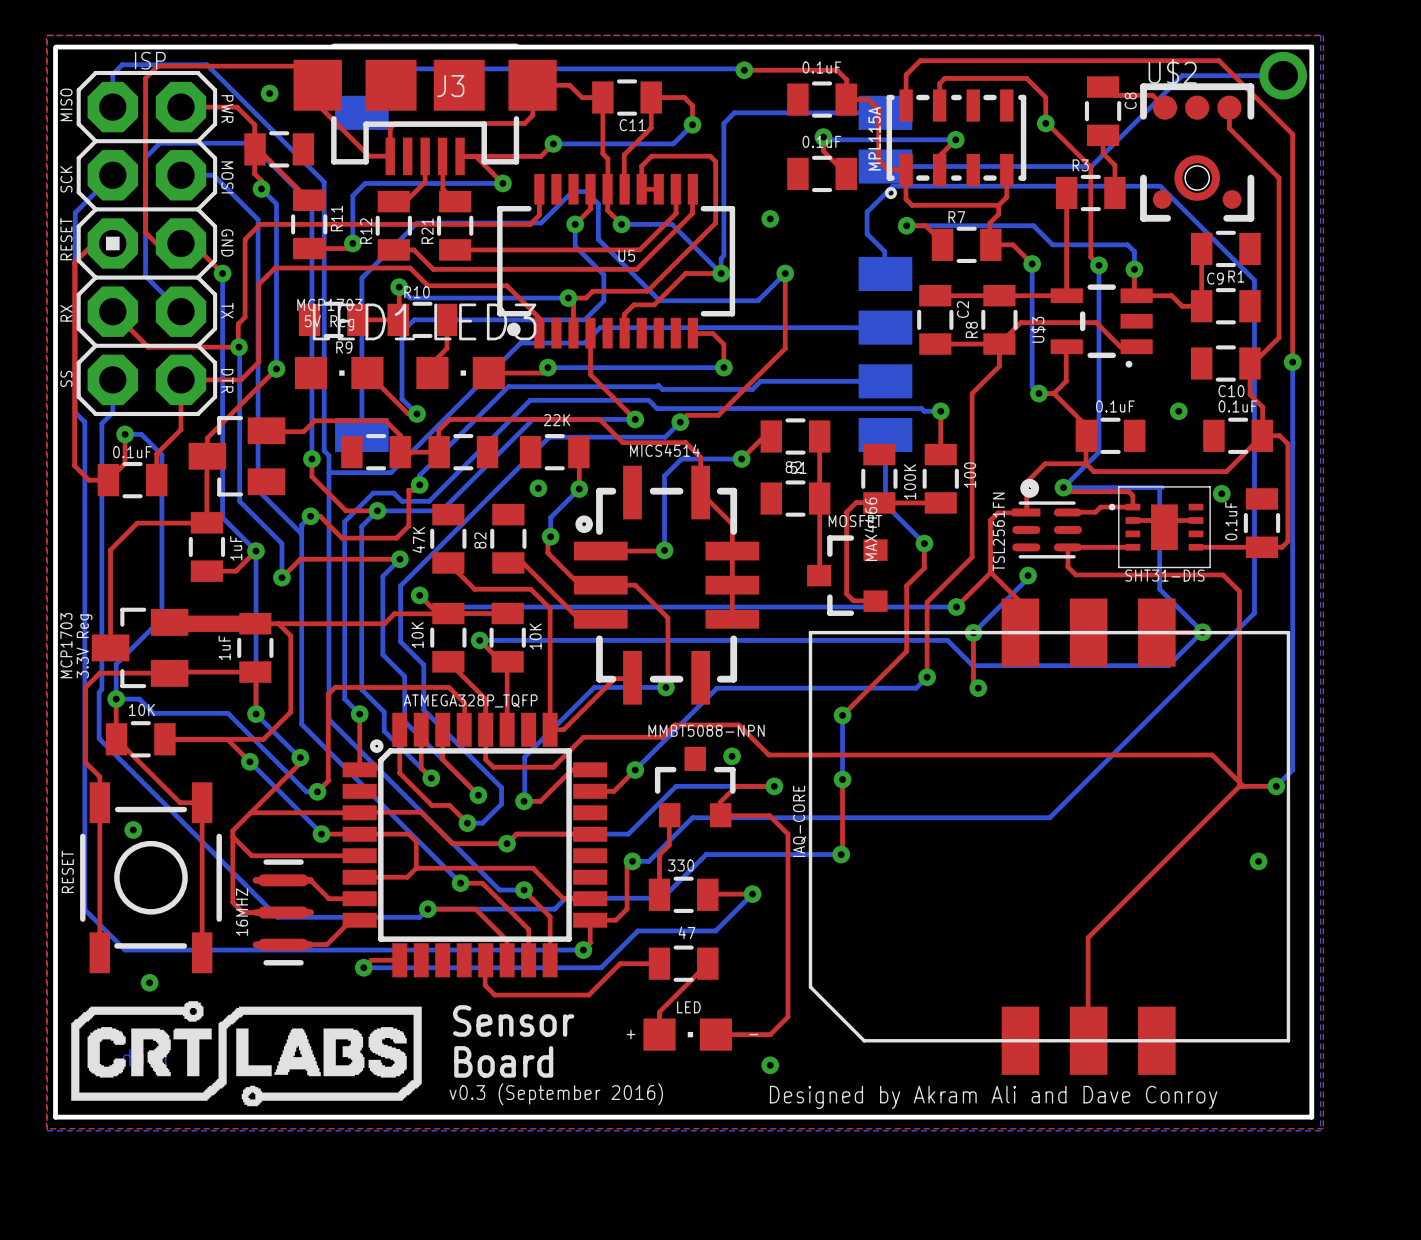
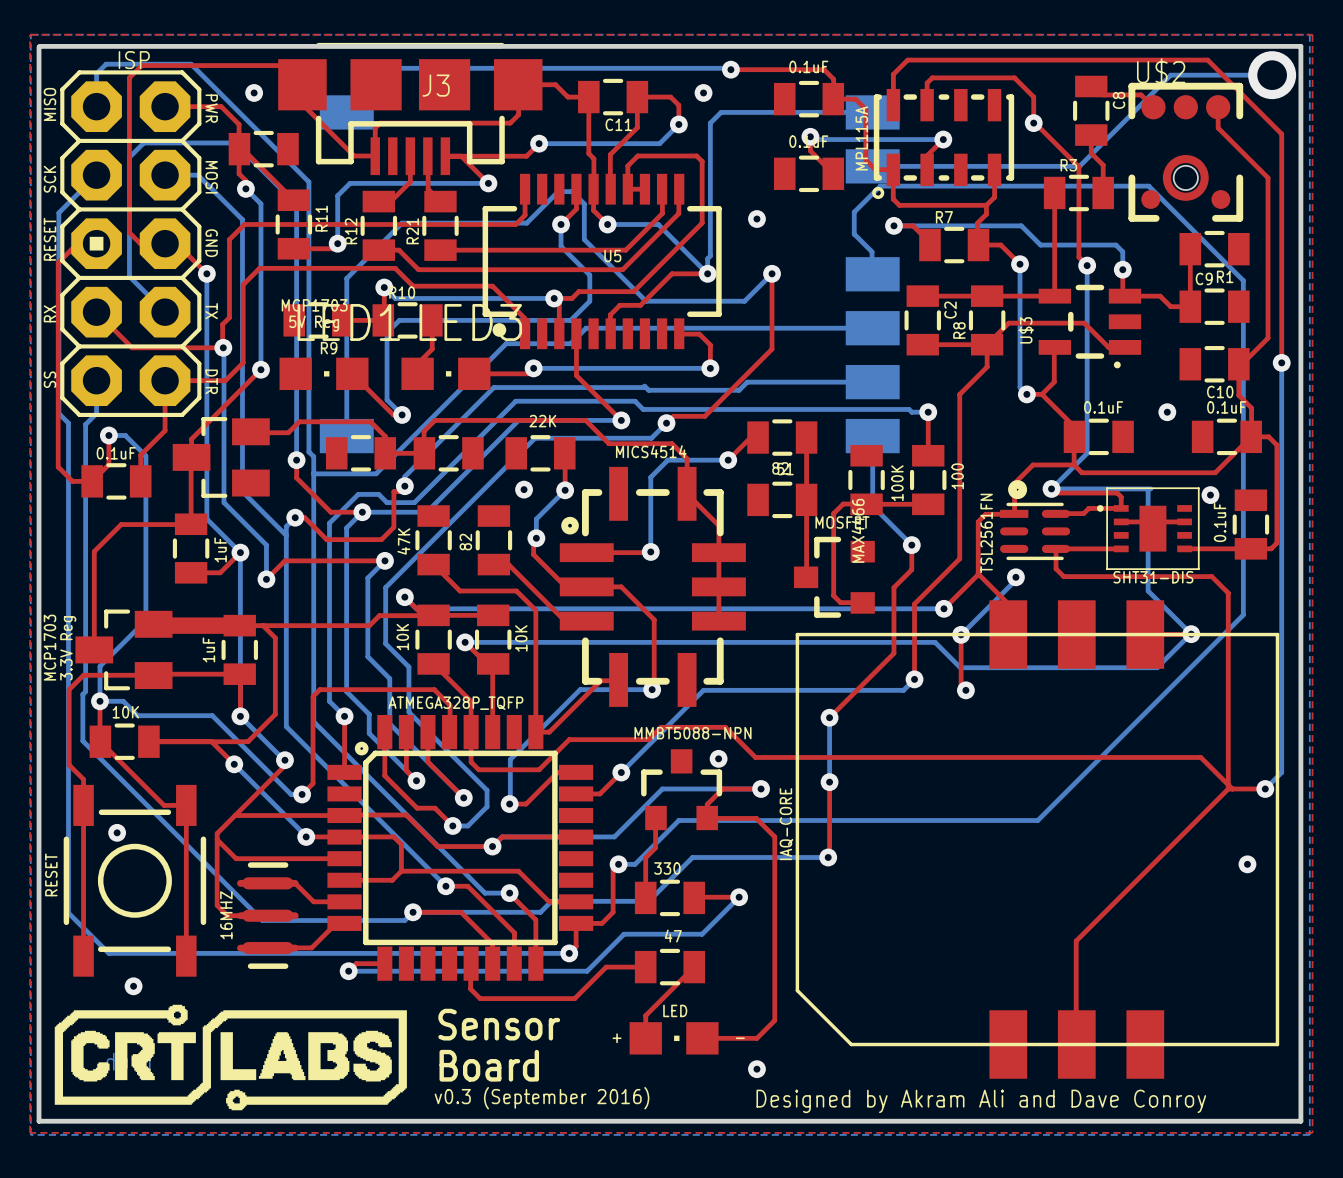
via: none -> (703, 92)

